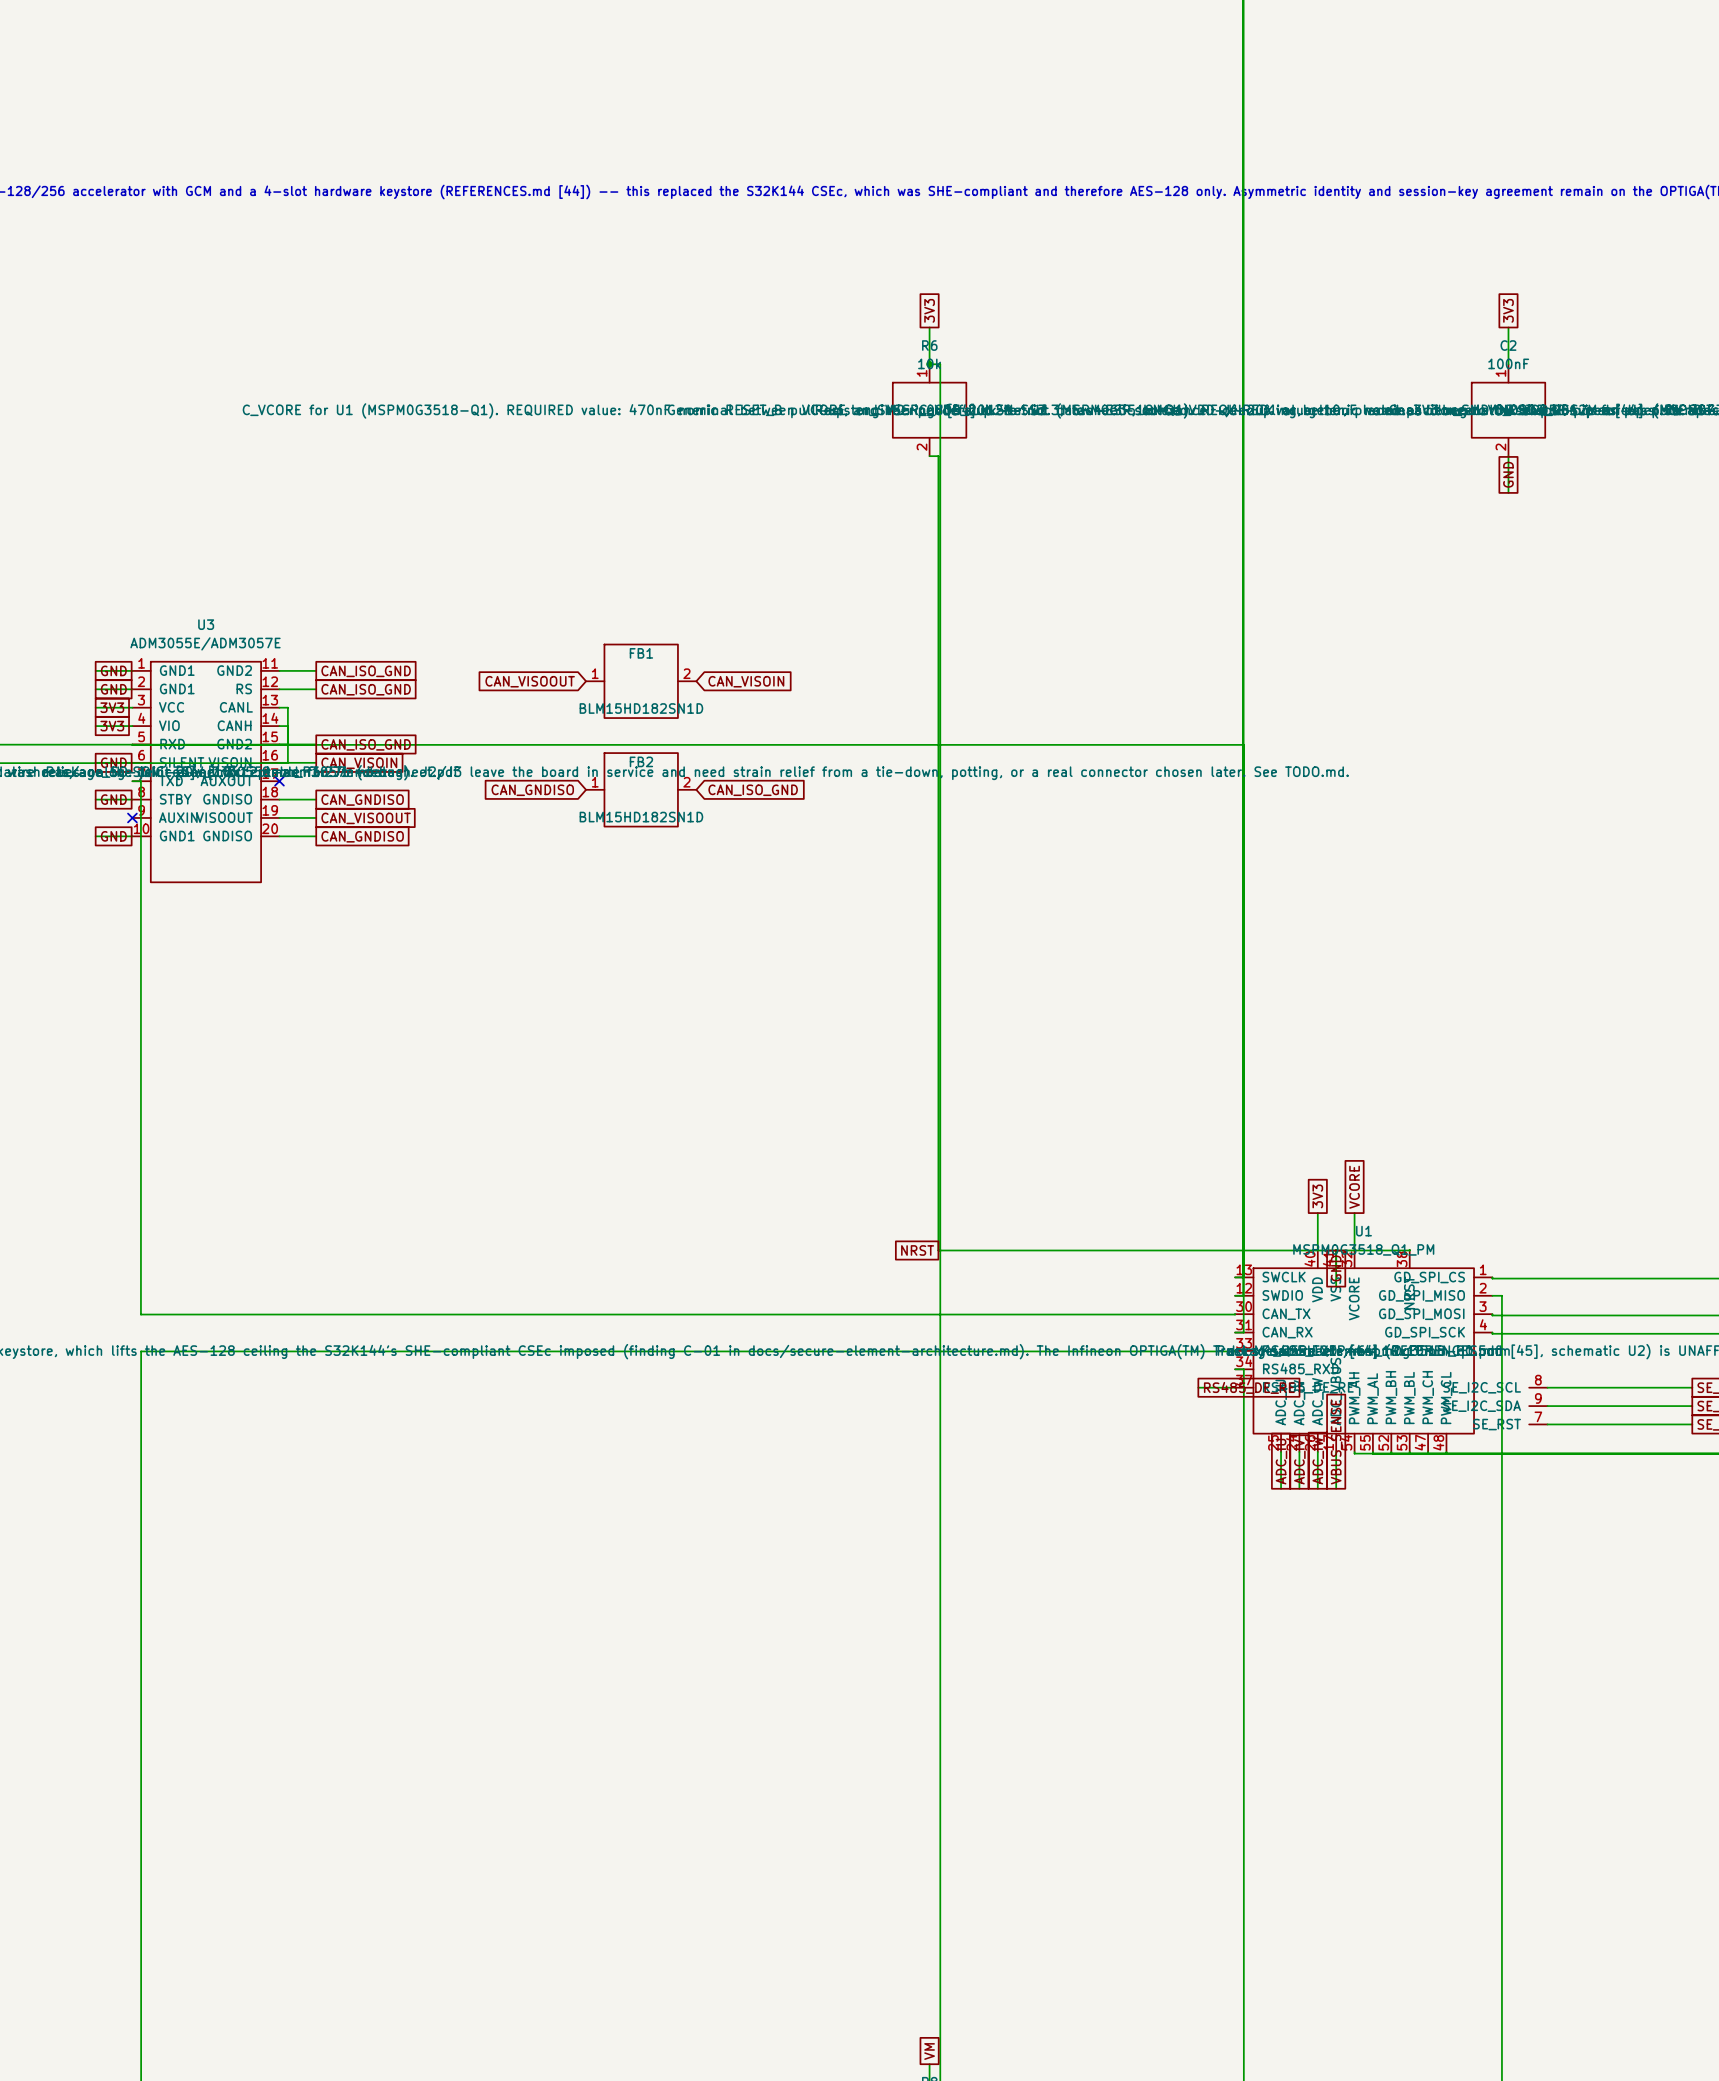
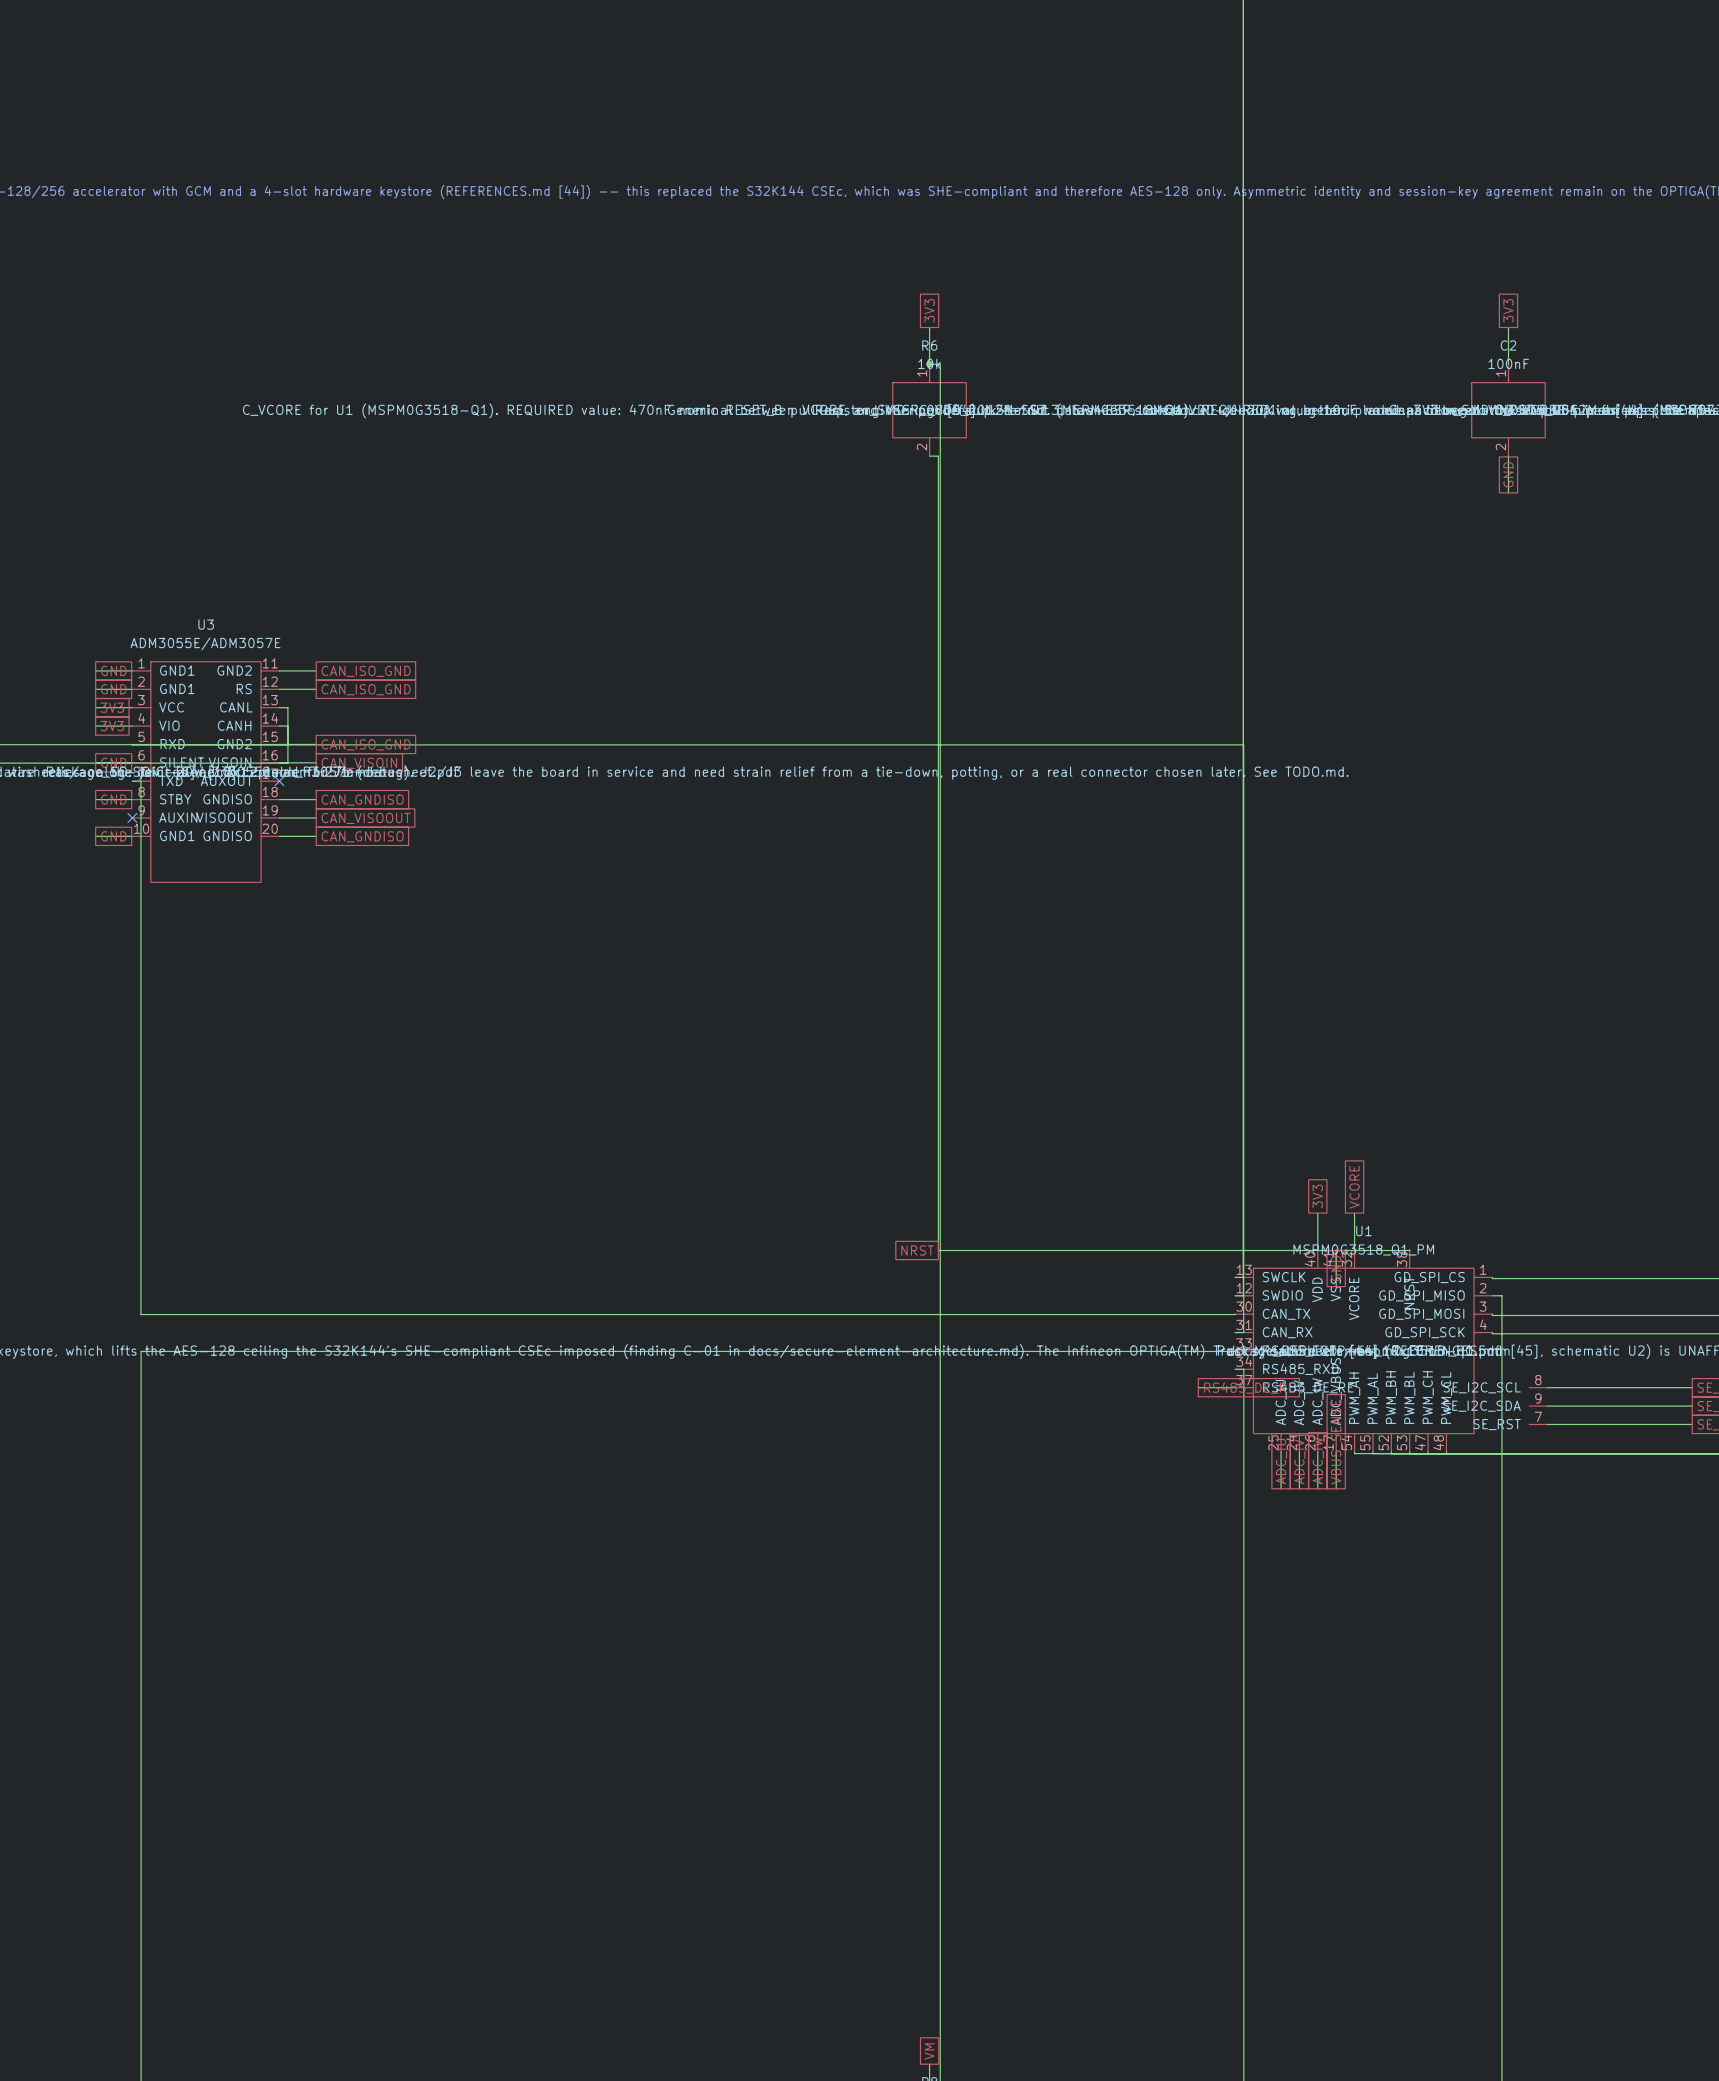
global label: CAN_VISOOUT (530, 681) -> none
FB1: BLM15HD182SN1D (641, 681) -> none
global label: CAN_VISOIN (746, 681) -> none
FB2: BLM15HD182SN1D (641, 789) -> none
global label: CAN_GNDISO (532, 790) -> none
global label: CAN_ISO_GND (753, 790) -> none

